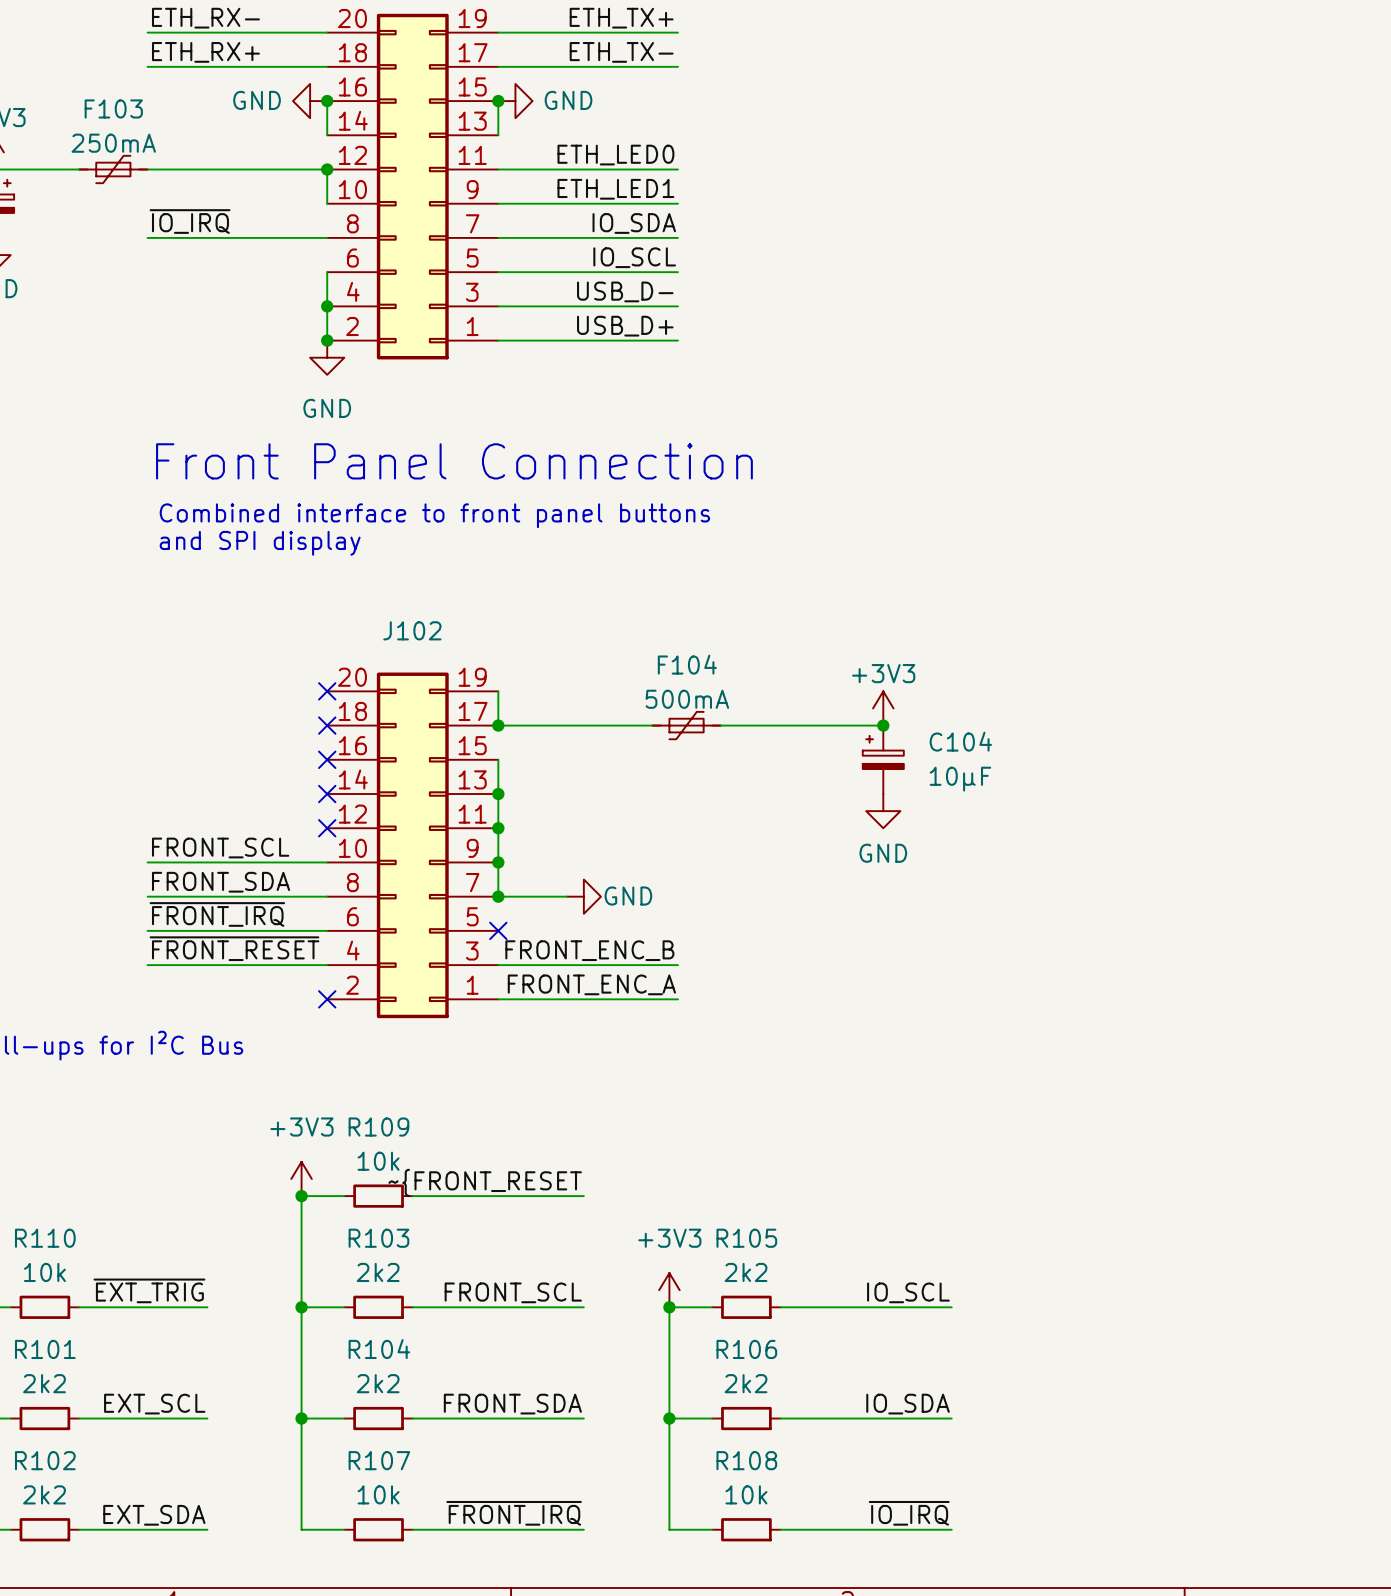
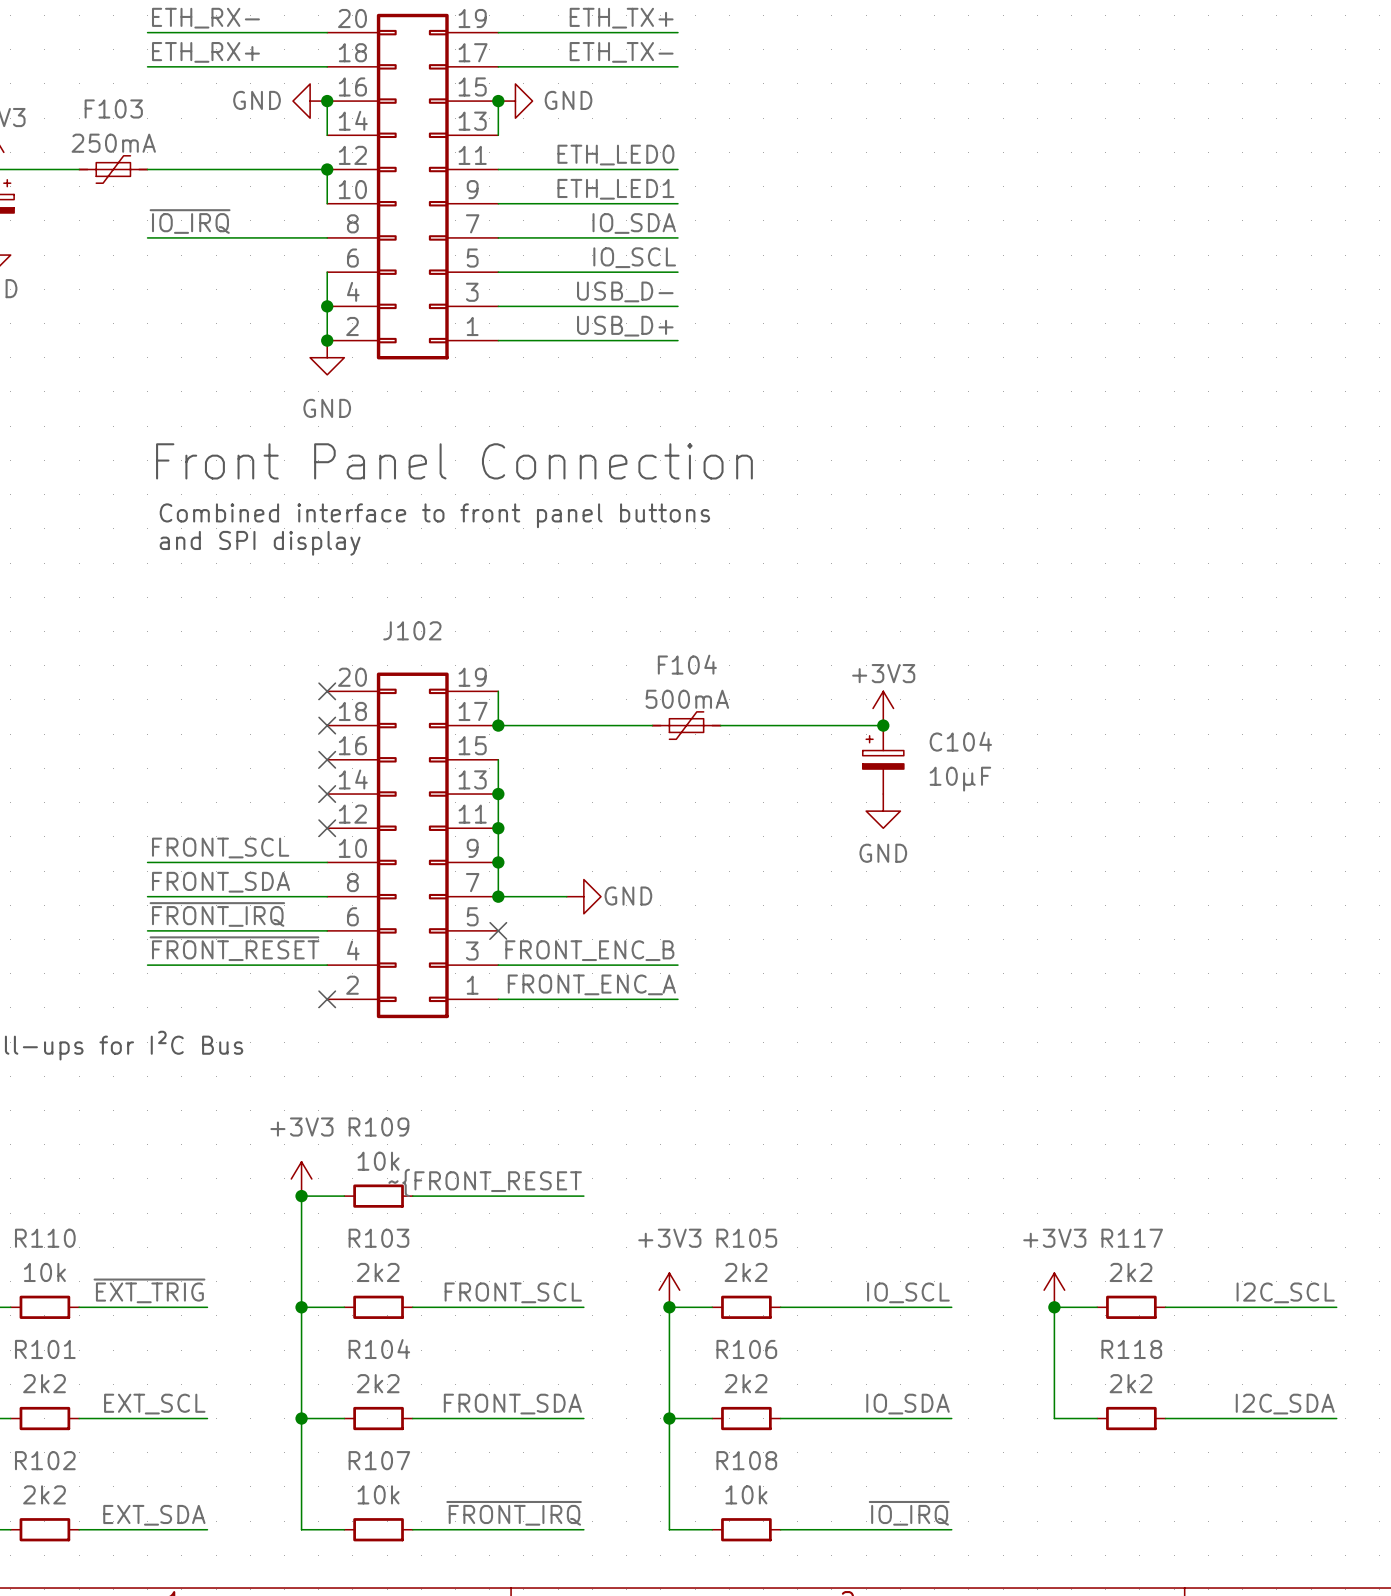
power symbol: none -> +3V3 (1054, 1290)
label: none -> I2C_SCL (1285, 1292)
junction: none -> (1054, 1307)
wire: none -> (1097, 1307) (1054, 1307) (1054, 1418) (1097, 1418)
R117: none -> 2k2 (1131, 1307)
wire: none -> (1165, 1307) (1336, 1307)
label: none -> I2C_SDA (1285, 1404)
R118: none -> 2k2 (1131, 1418)
wire: none -> (1165, 1418) (1336, 1418)

